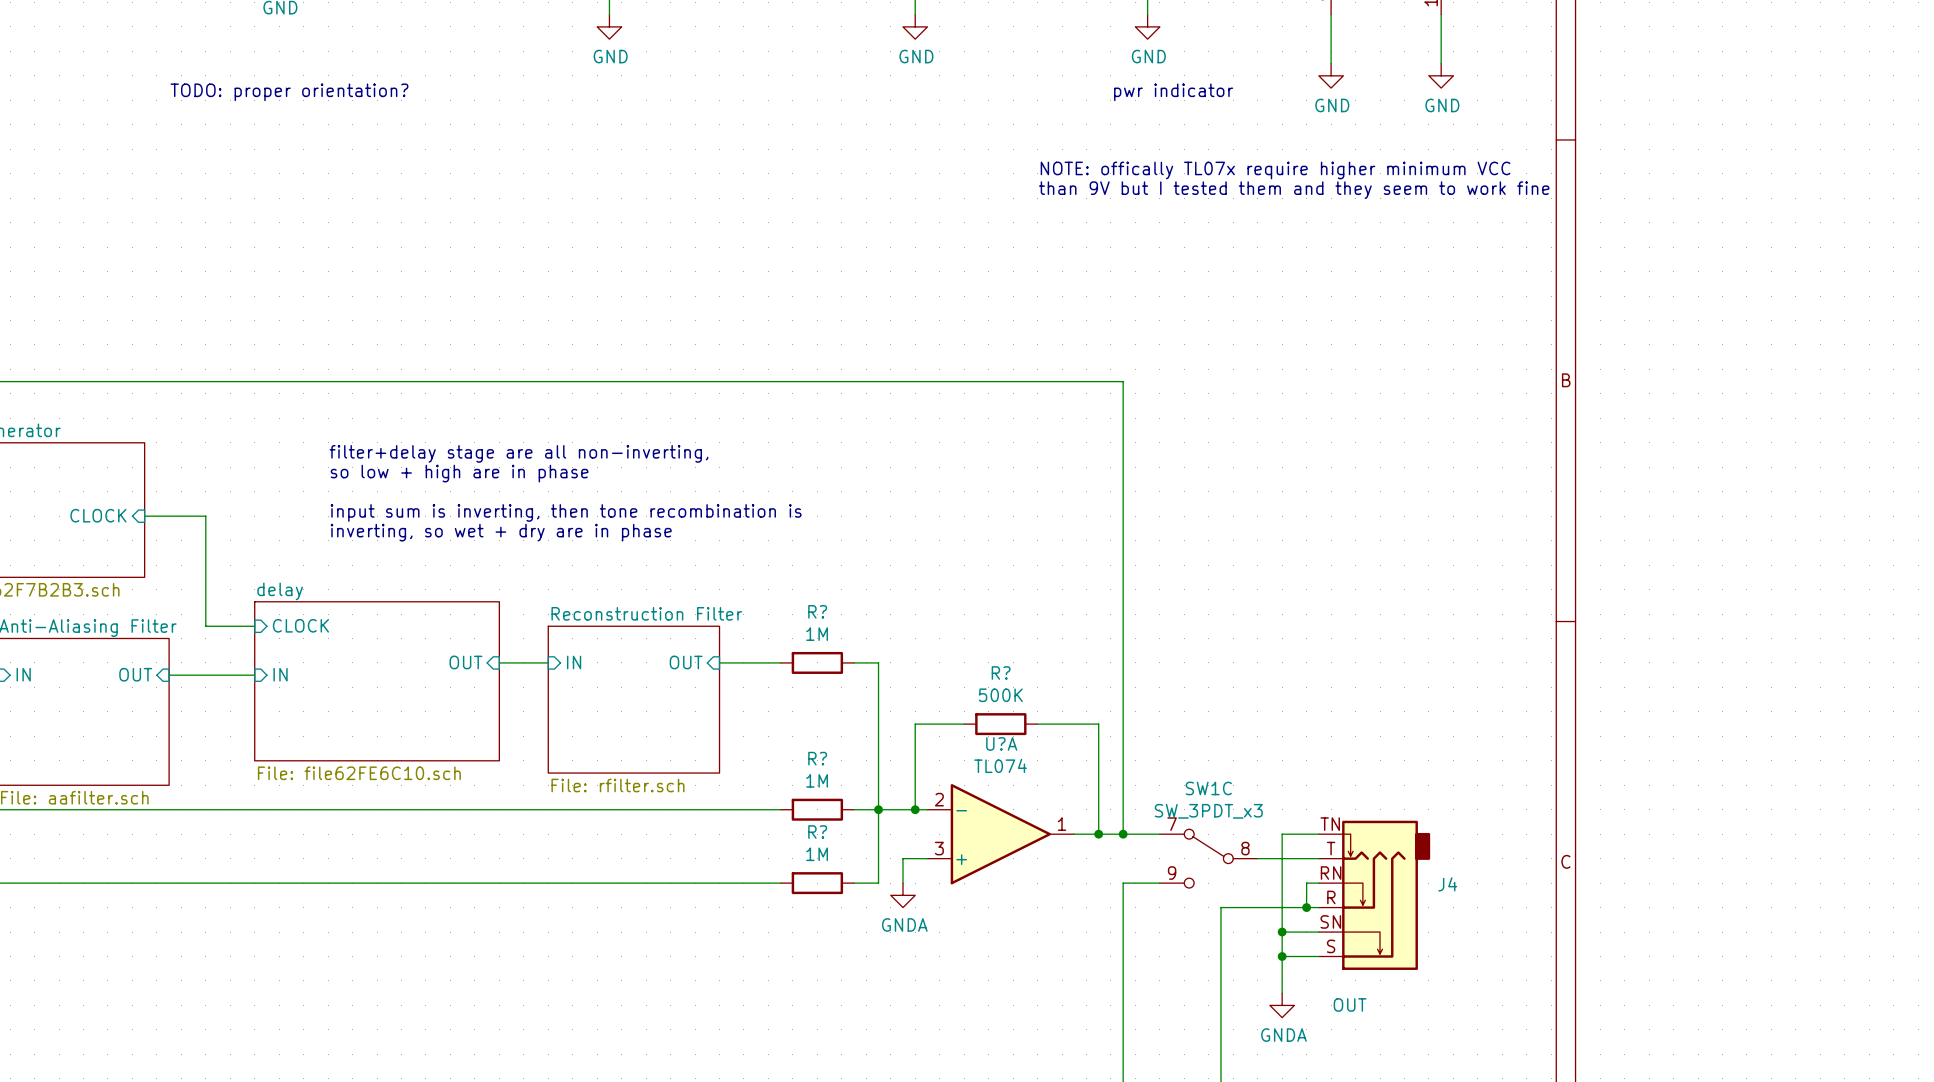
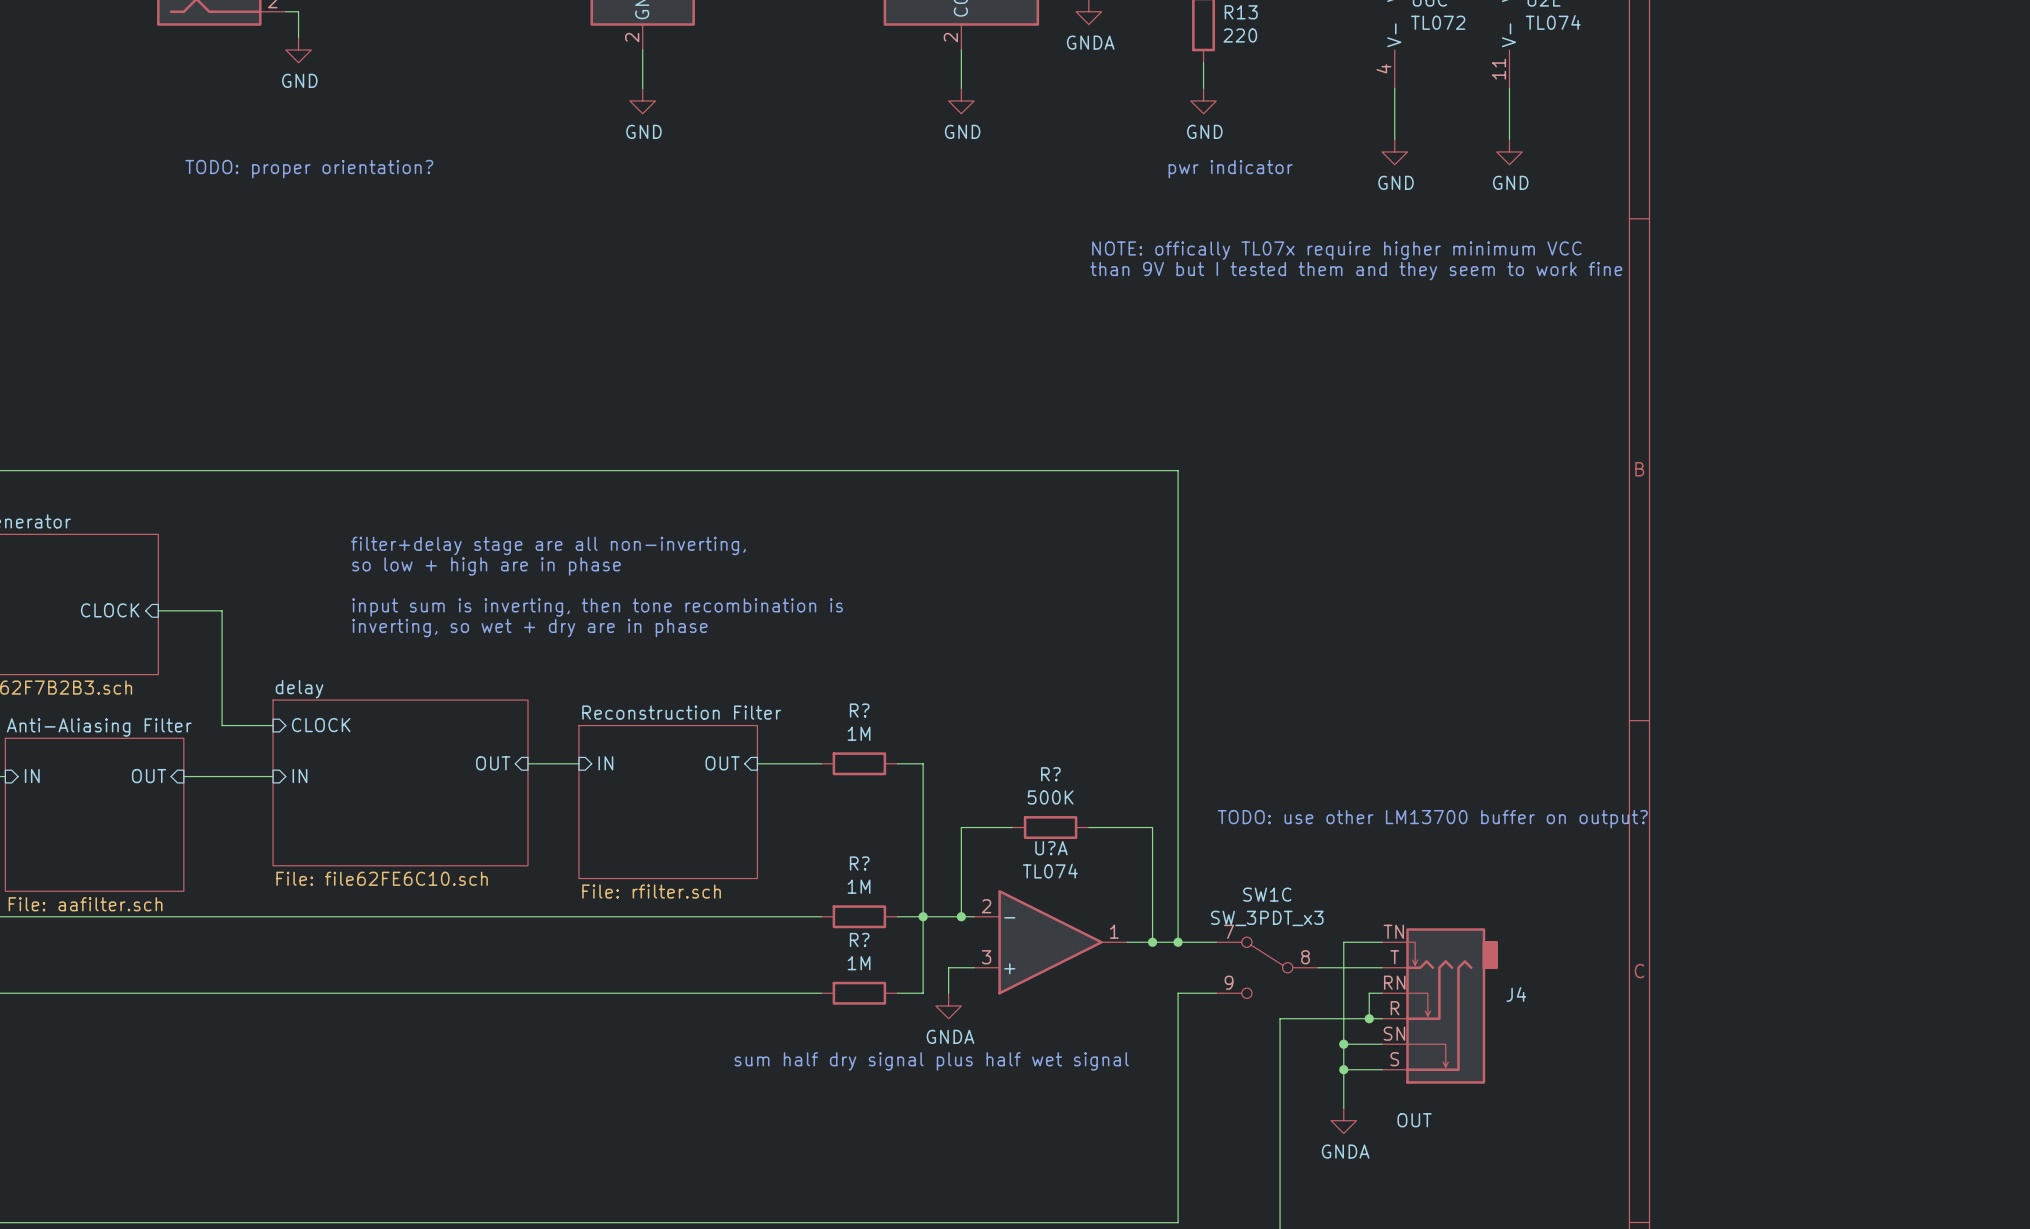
text: none -> TODO: use other LM13700 buffer on output? (1432, 819)
text: none -> sum half dry signal plus half wet signal (931, 1061)

